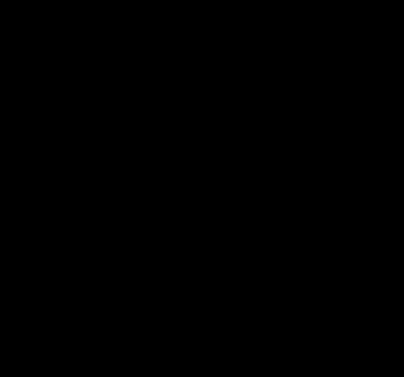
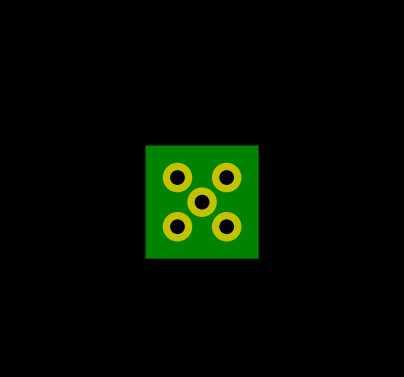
part: none -> (202, 202)

